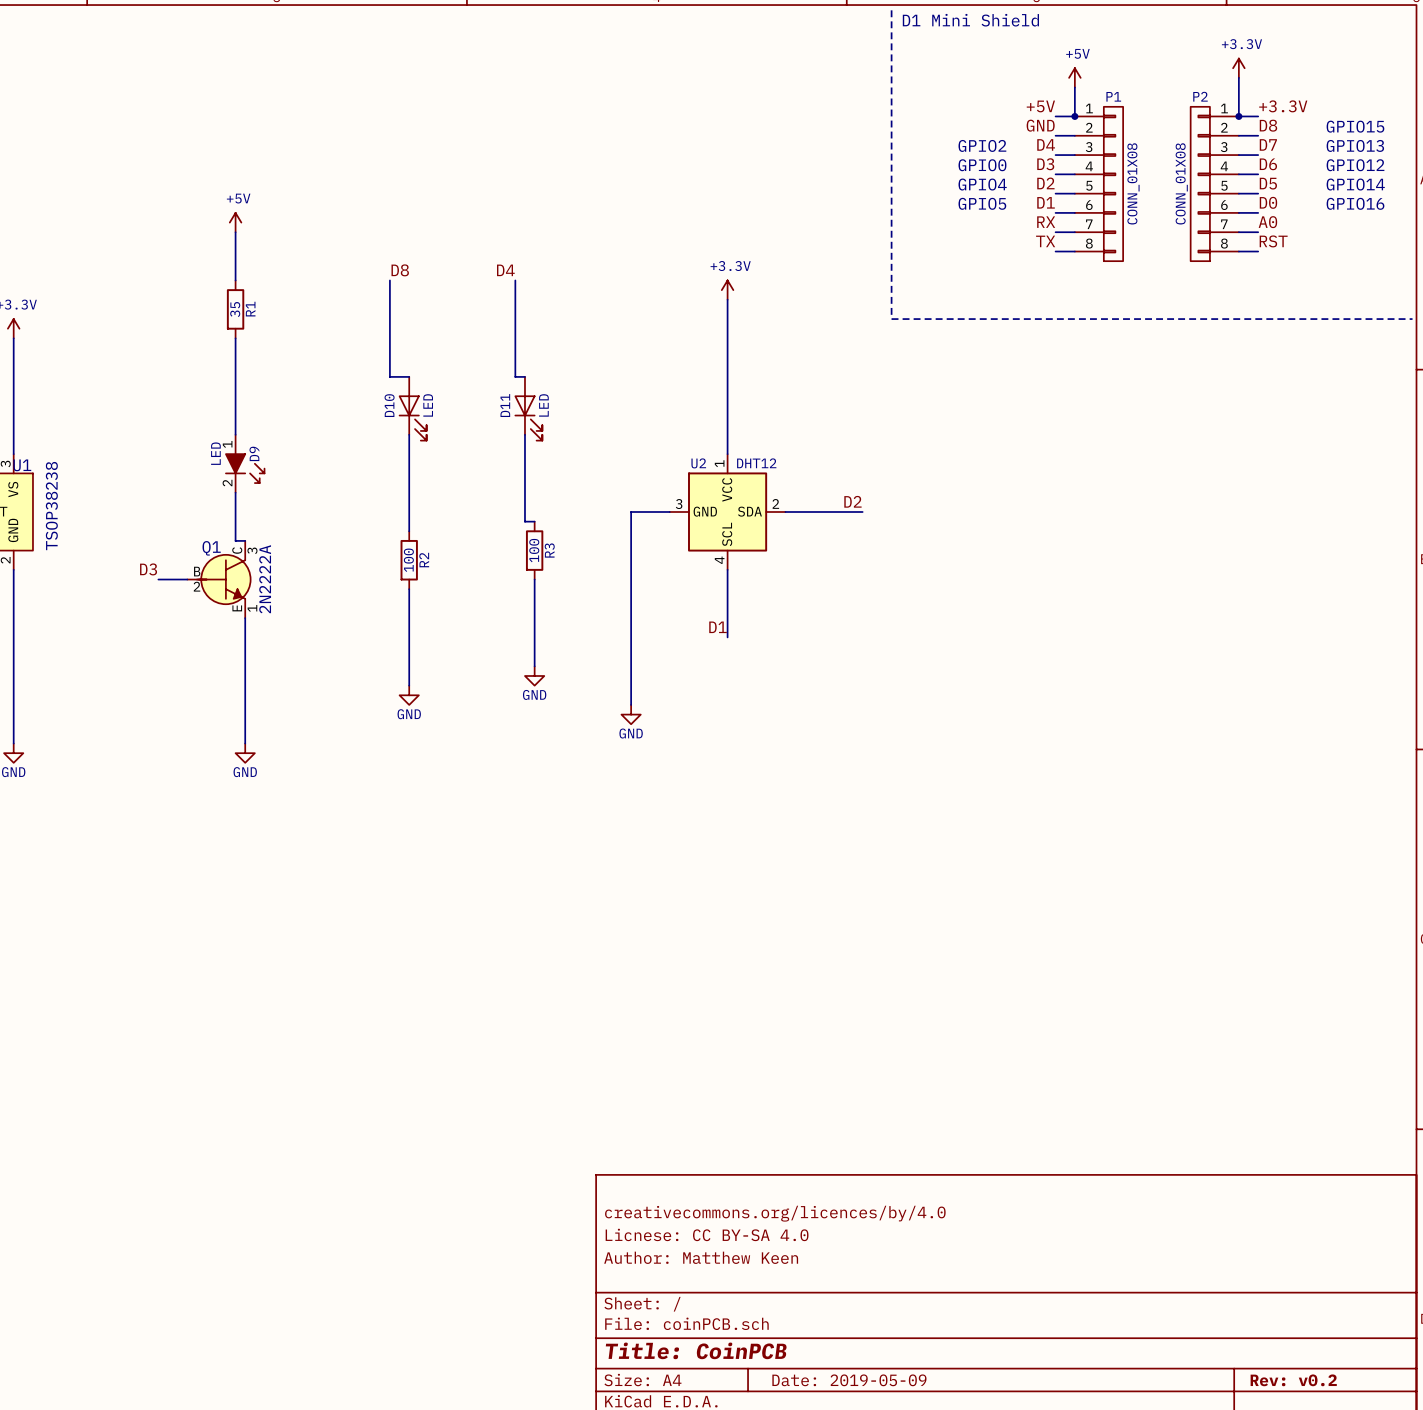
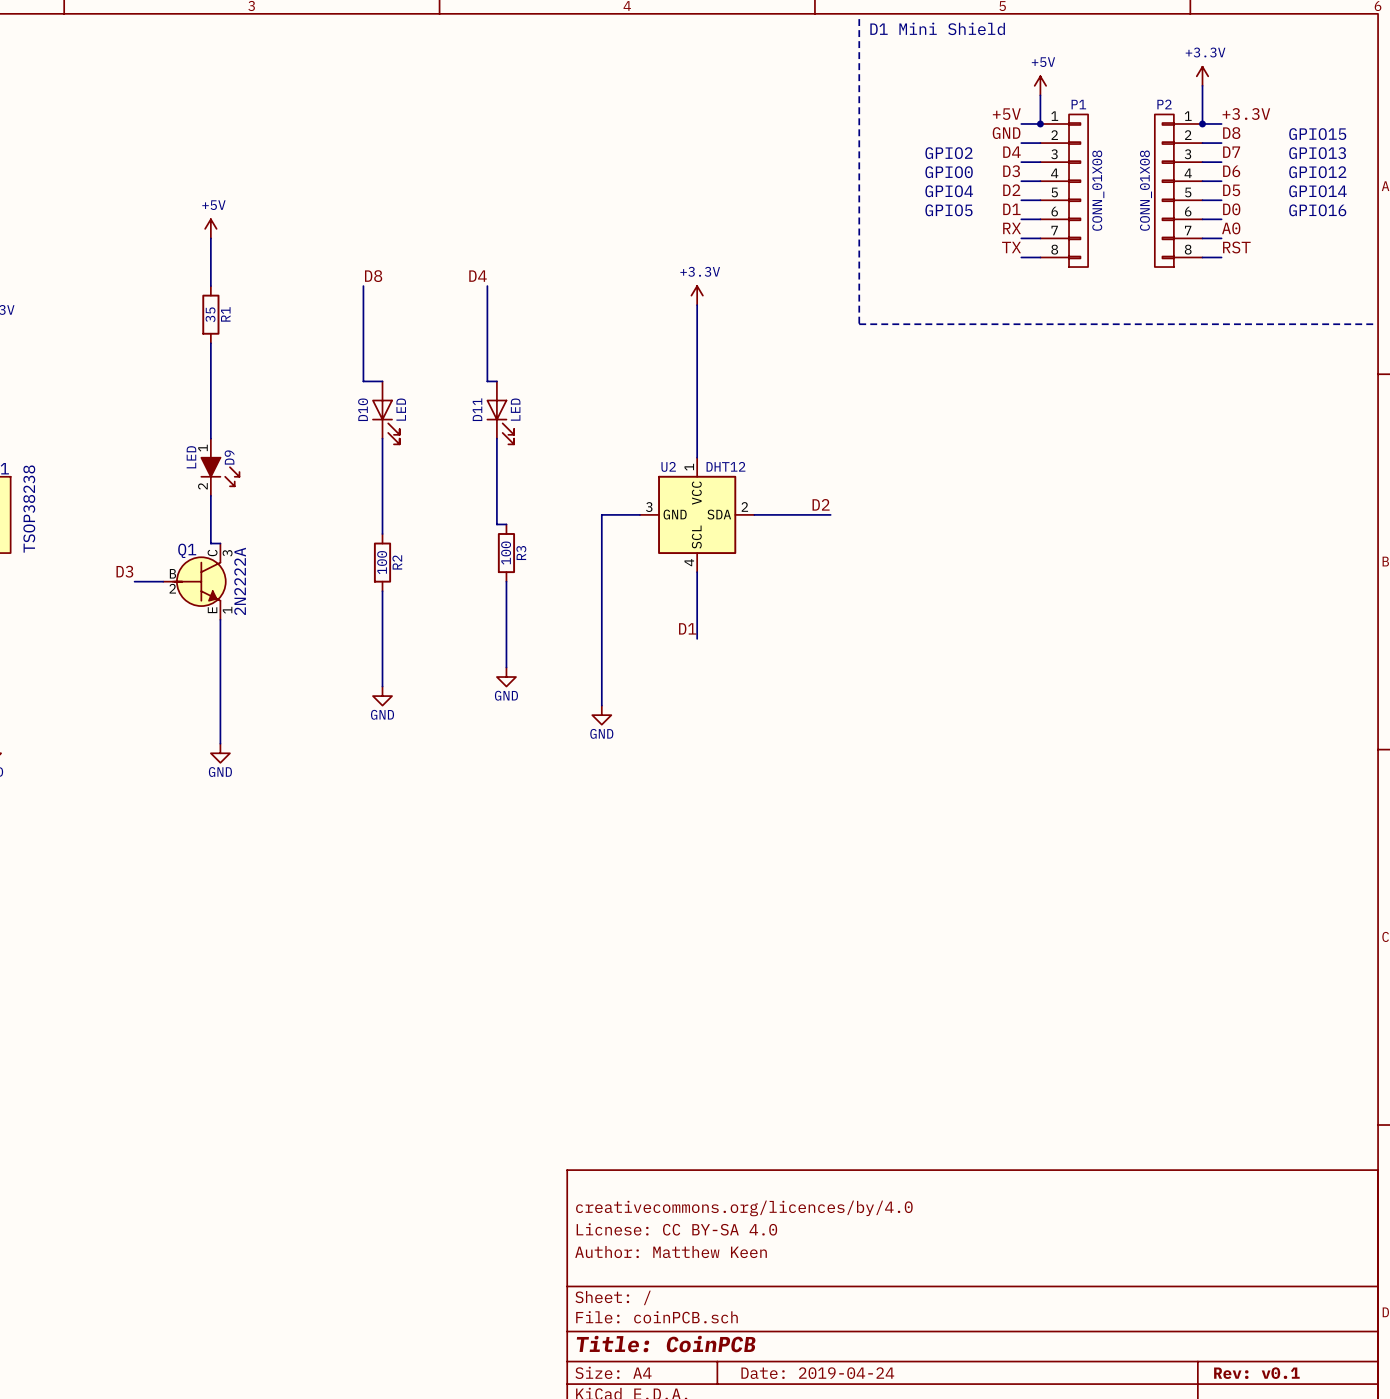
title block: Date: 2019-05-09 (849, 1380) -> Date: 2019-04-24 (817, 1373)
title block: Rev: v0.2 (1293, 1380) -> Rev: v0.1 (1256, 1373)

